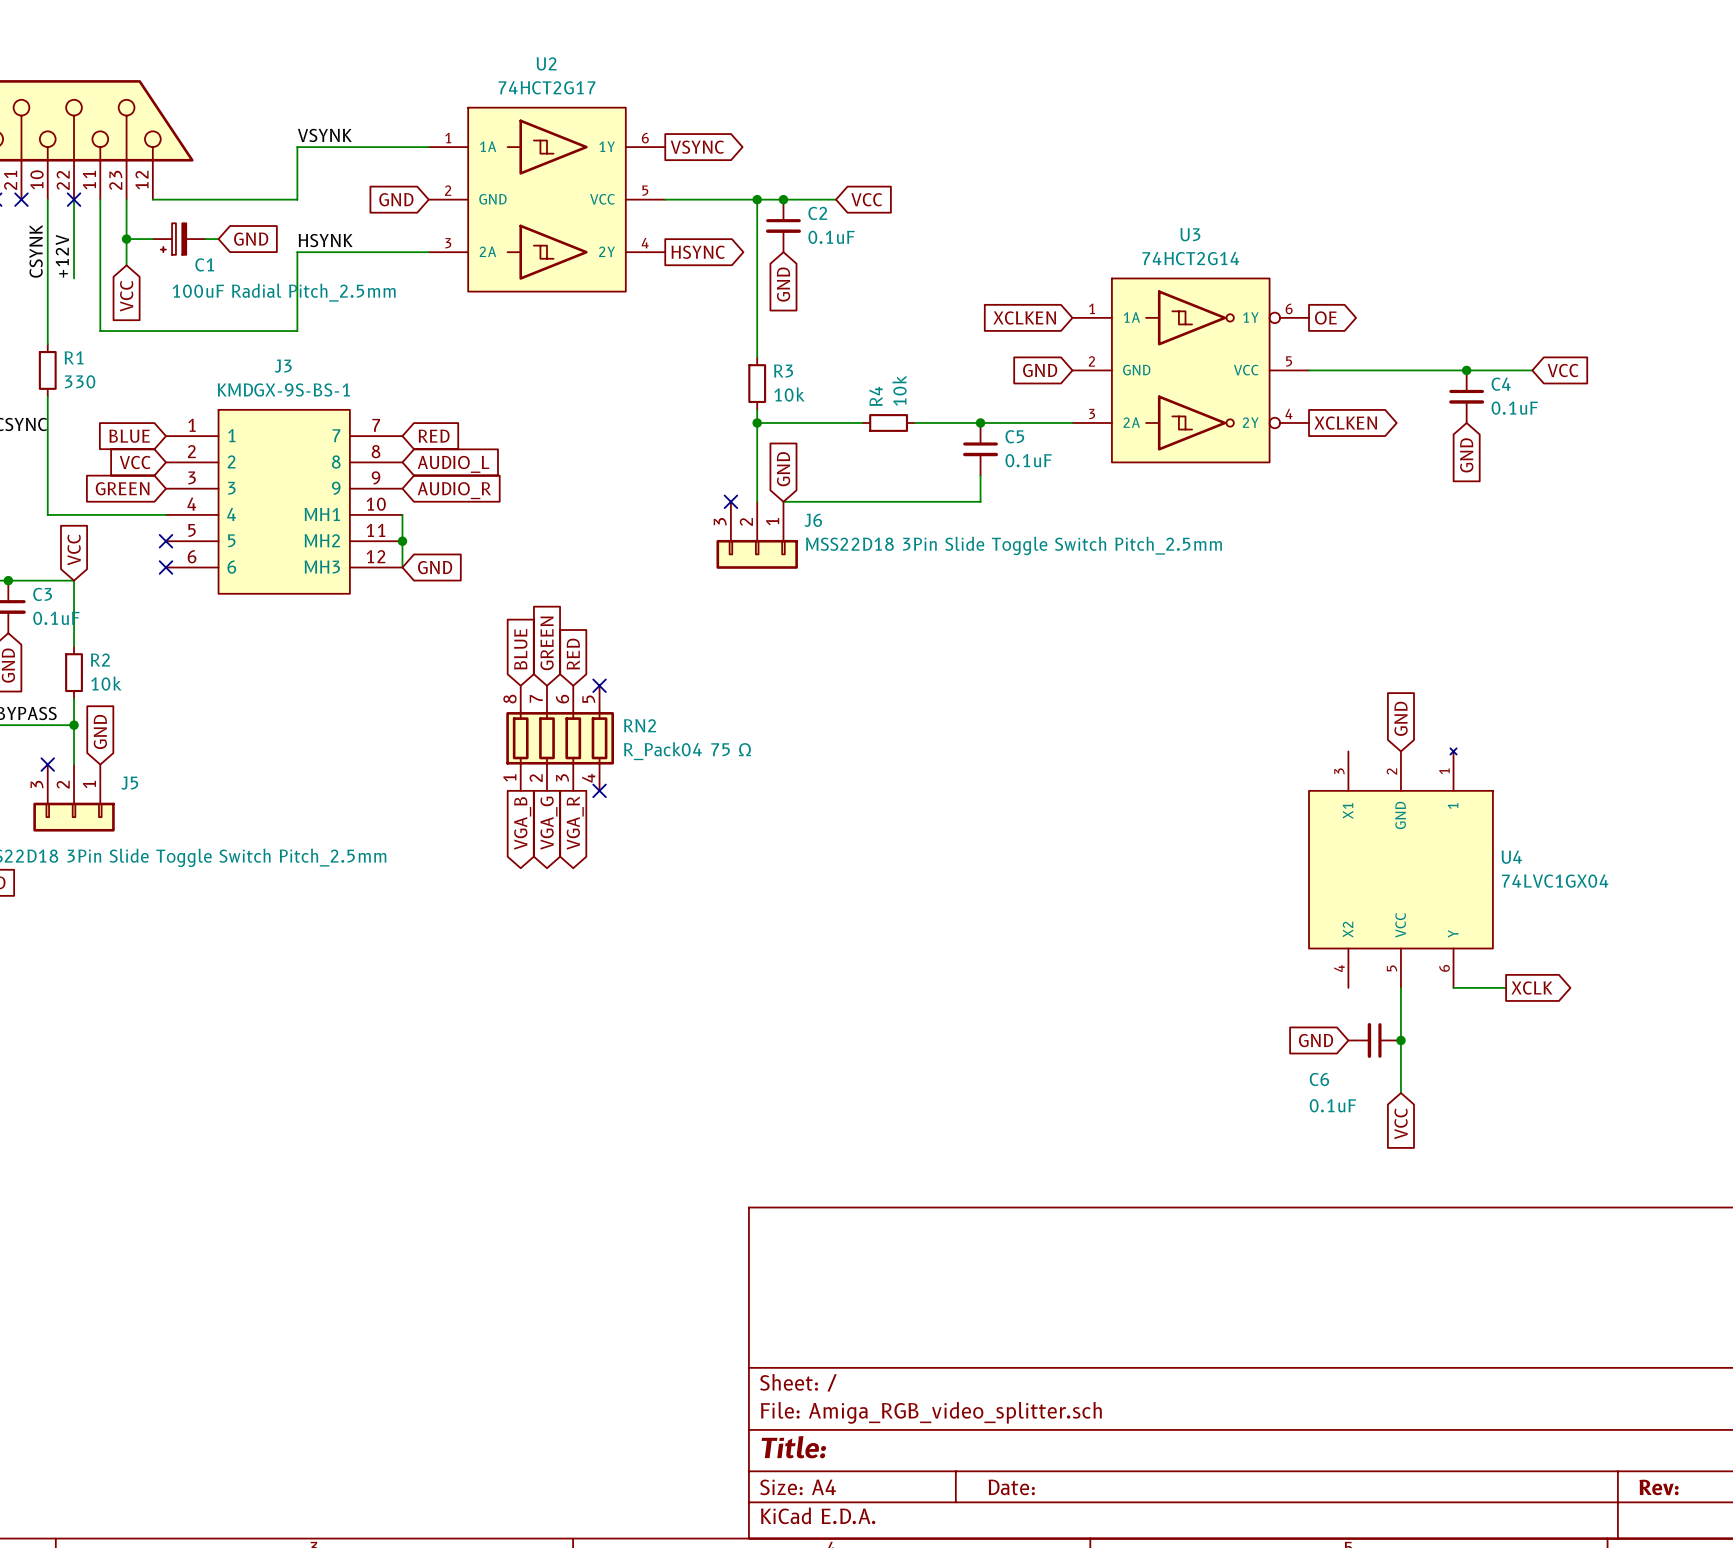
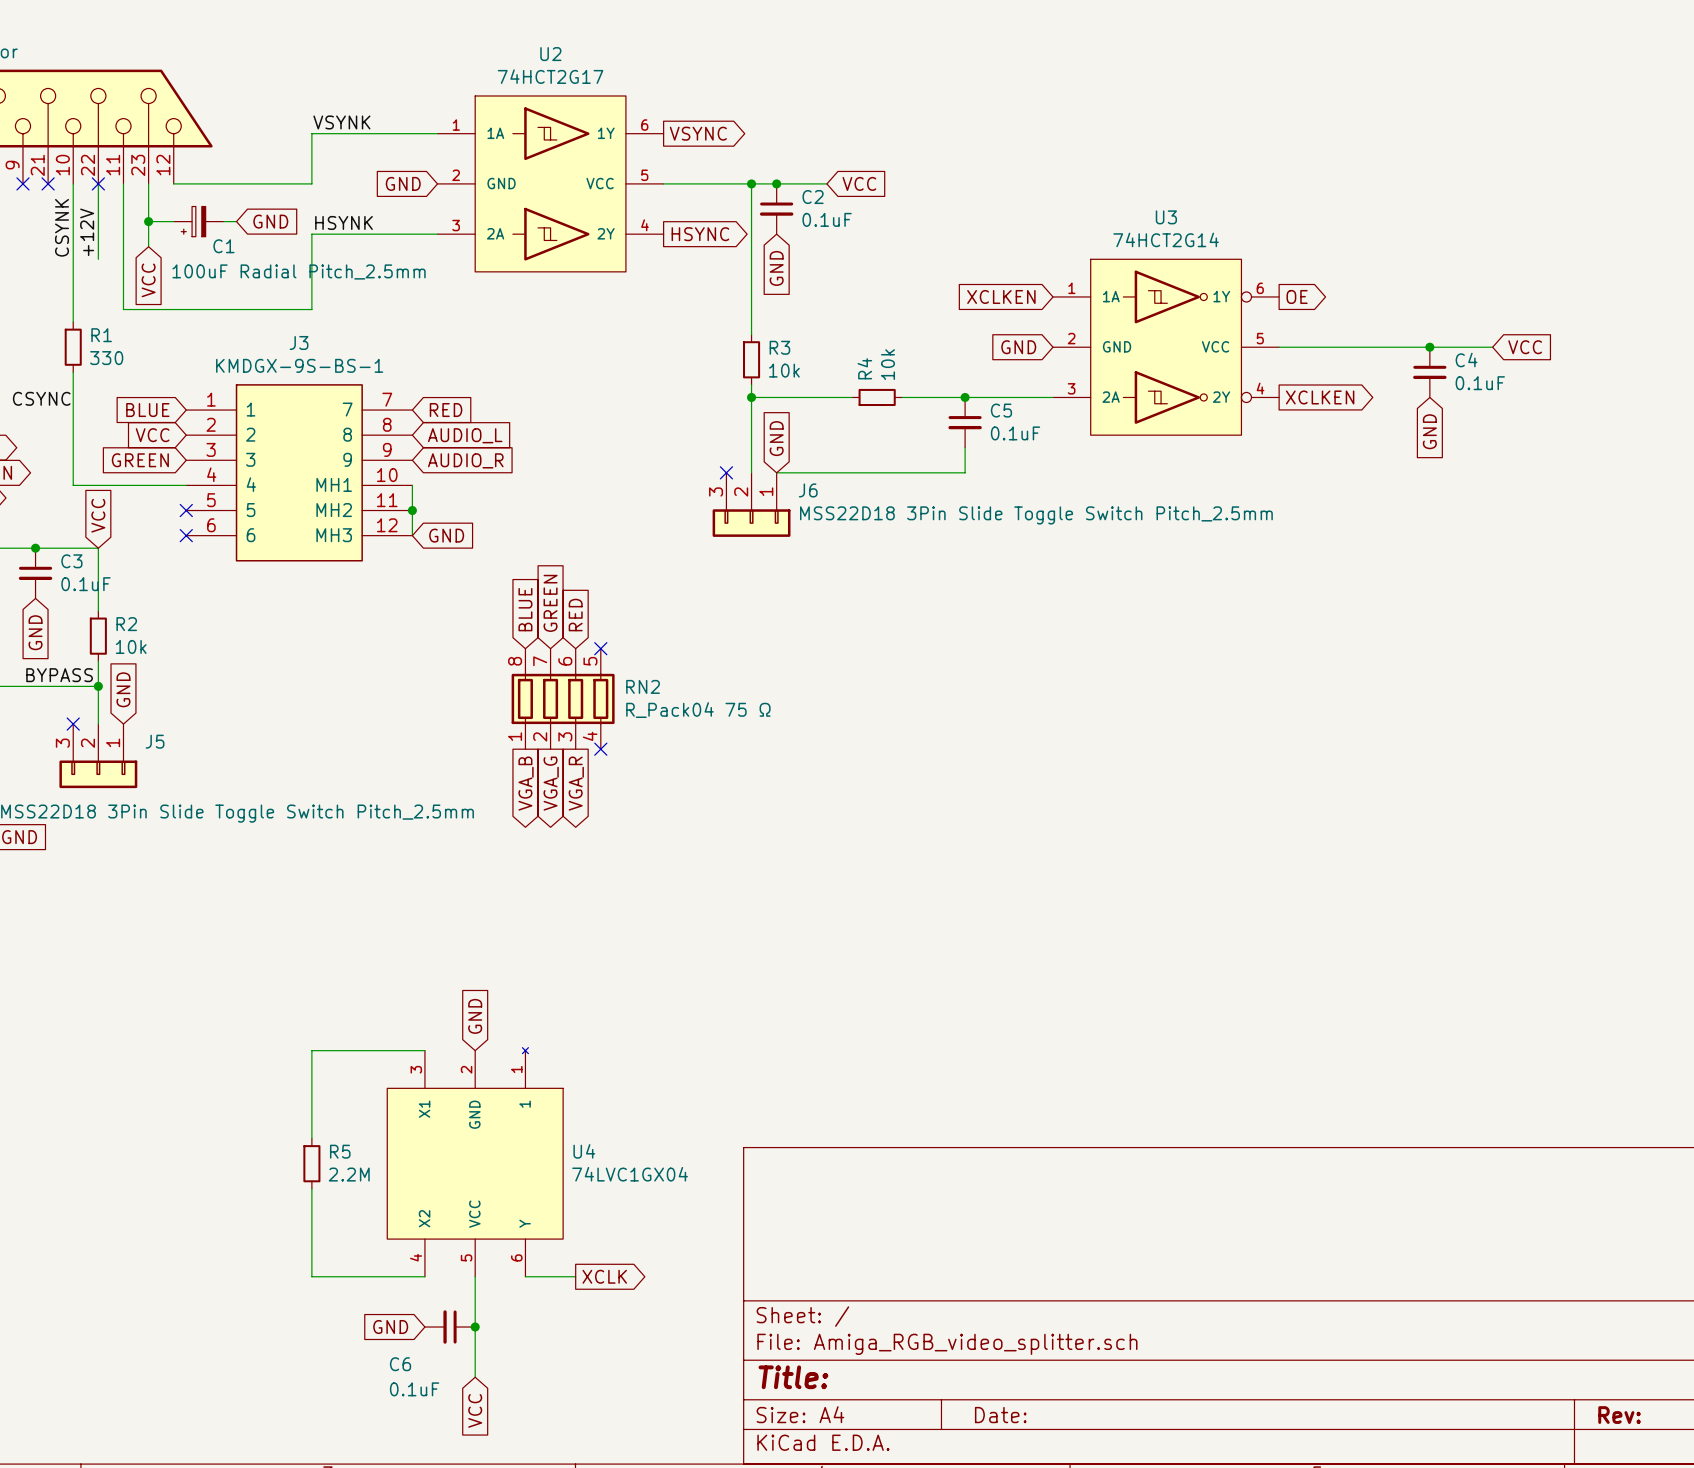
global label: GND (1401, 718) -> none
U4 position: (1400, 868) -> (475, 1162)
wire: (1400, 987) (1400, 1093) -> none
wire: (1453, 987) (1506, 987) -> none
global label: XCLK (1531, 988) -> none
global label: GND (1316, 1040) -> none
C6 position: (1374, 1040) -> (450, 1327)
junction: (1400, 1040) -> none
global label: none -> GND (475, 1016)
wire: none -> (424, 1050) (311, 1050) (311, 1138)
global label: VCC (1401, 1123) -> none
R5: none -> 2.2M (311, 1163)
wire: none -> (311, 1188) (311, 1276) (424, 1276)
wire: none -> (475, 1276) (475, 1377)
wire: none -> (525, 1276) (575, 1276)
global label: none -> XCLK (604, 1276)
global label: none -> GND (390, 1327)
junction: none -> (475, 1327)
global label: none -> VCC (475, 1410)

